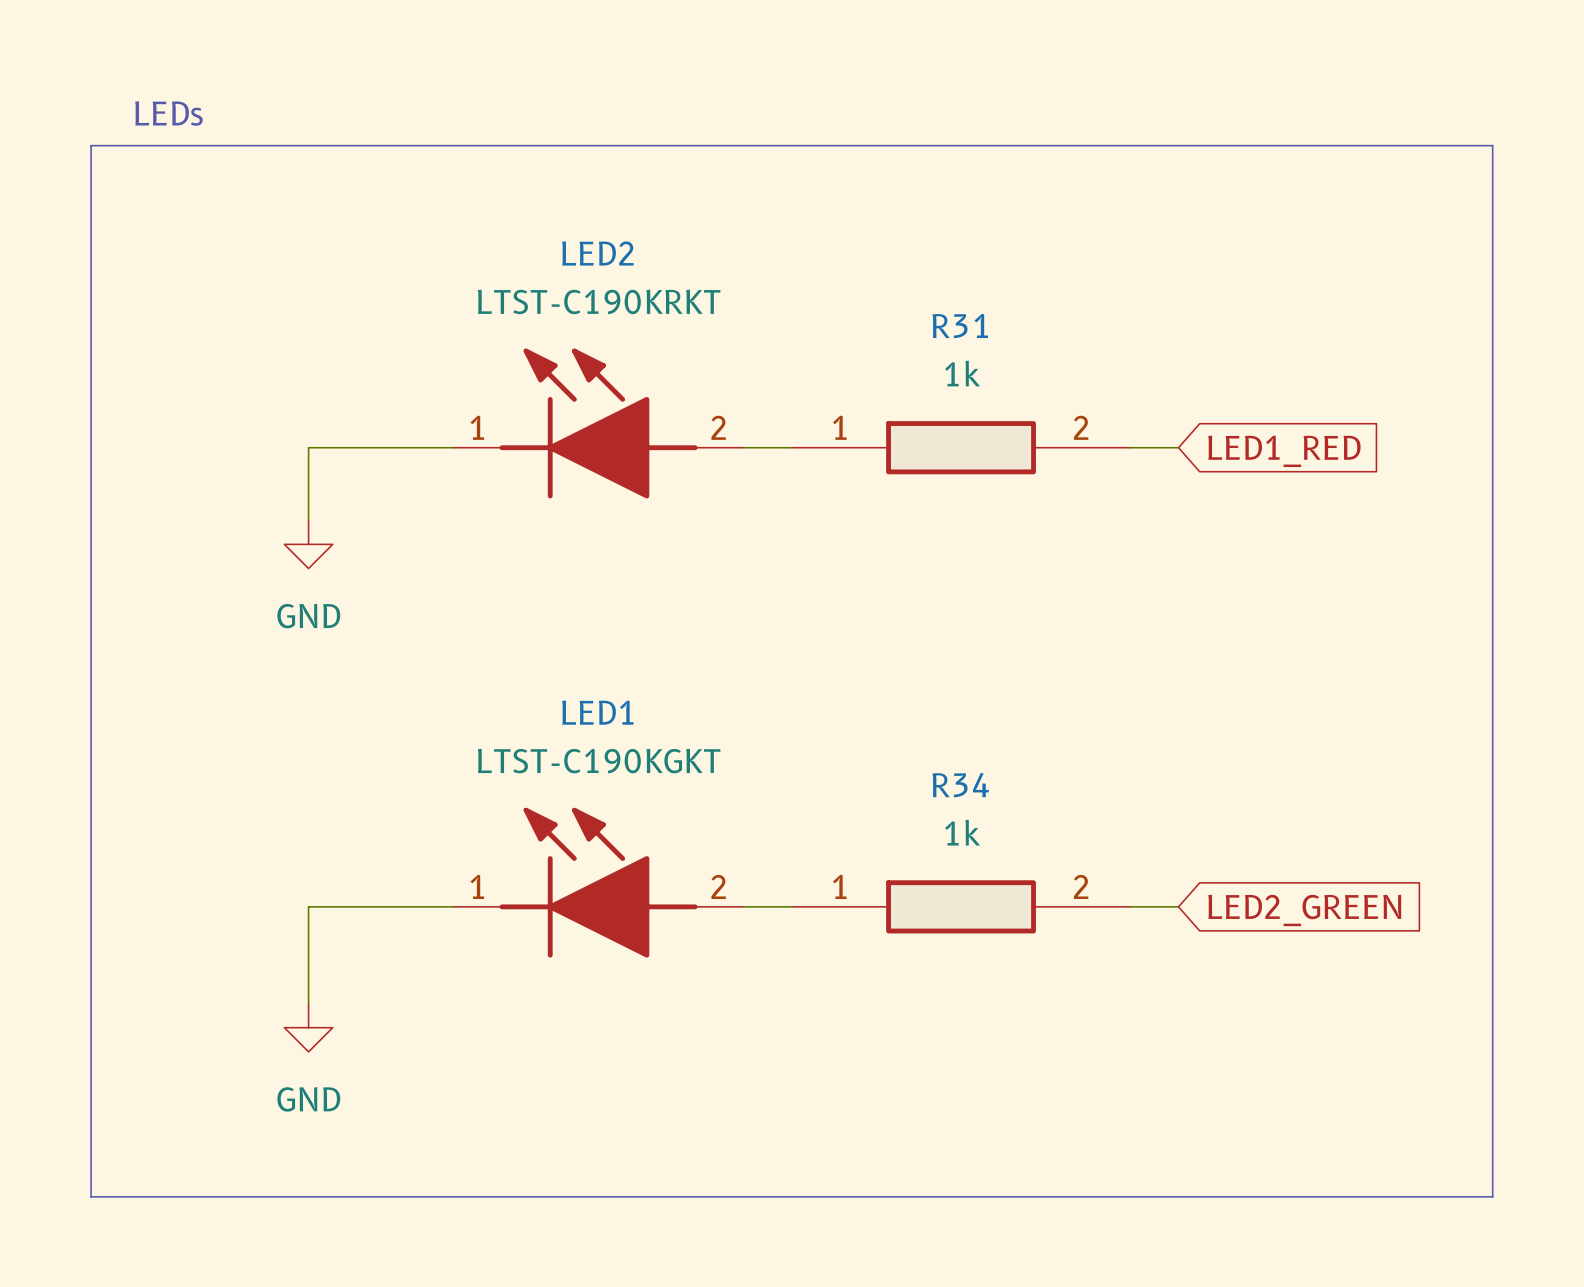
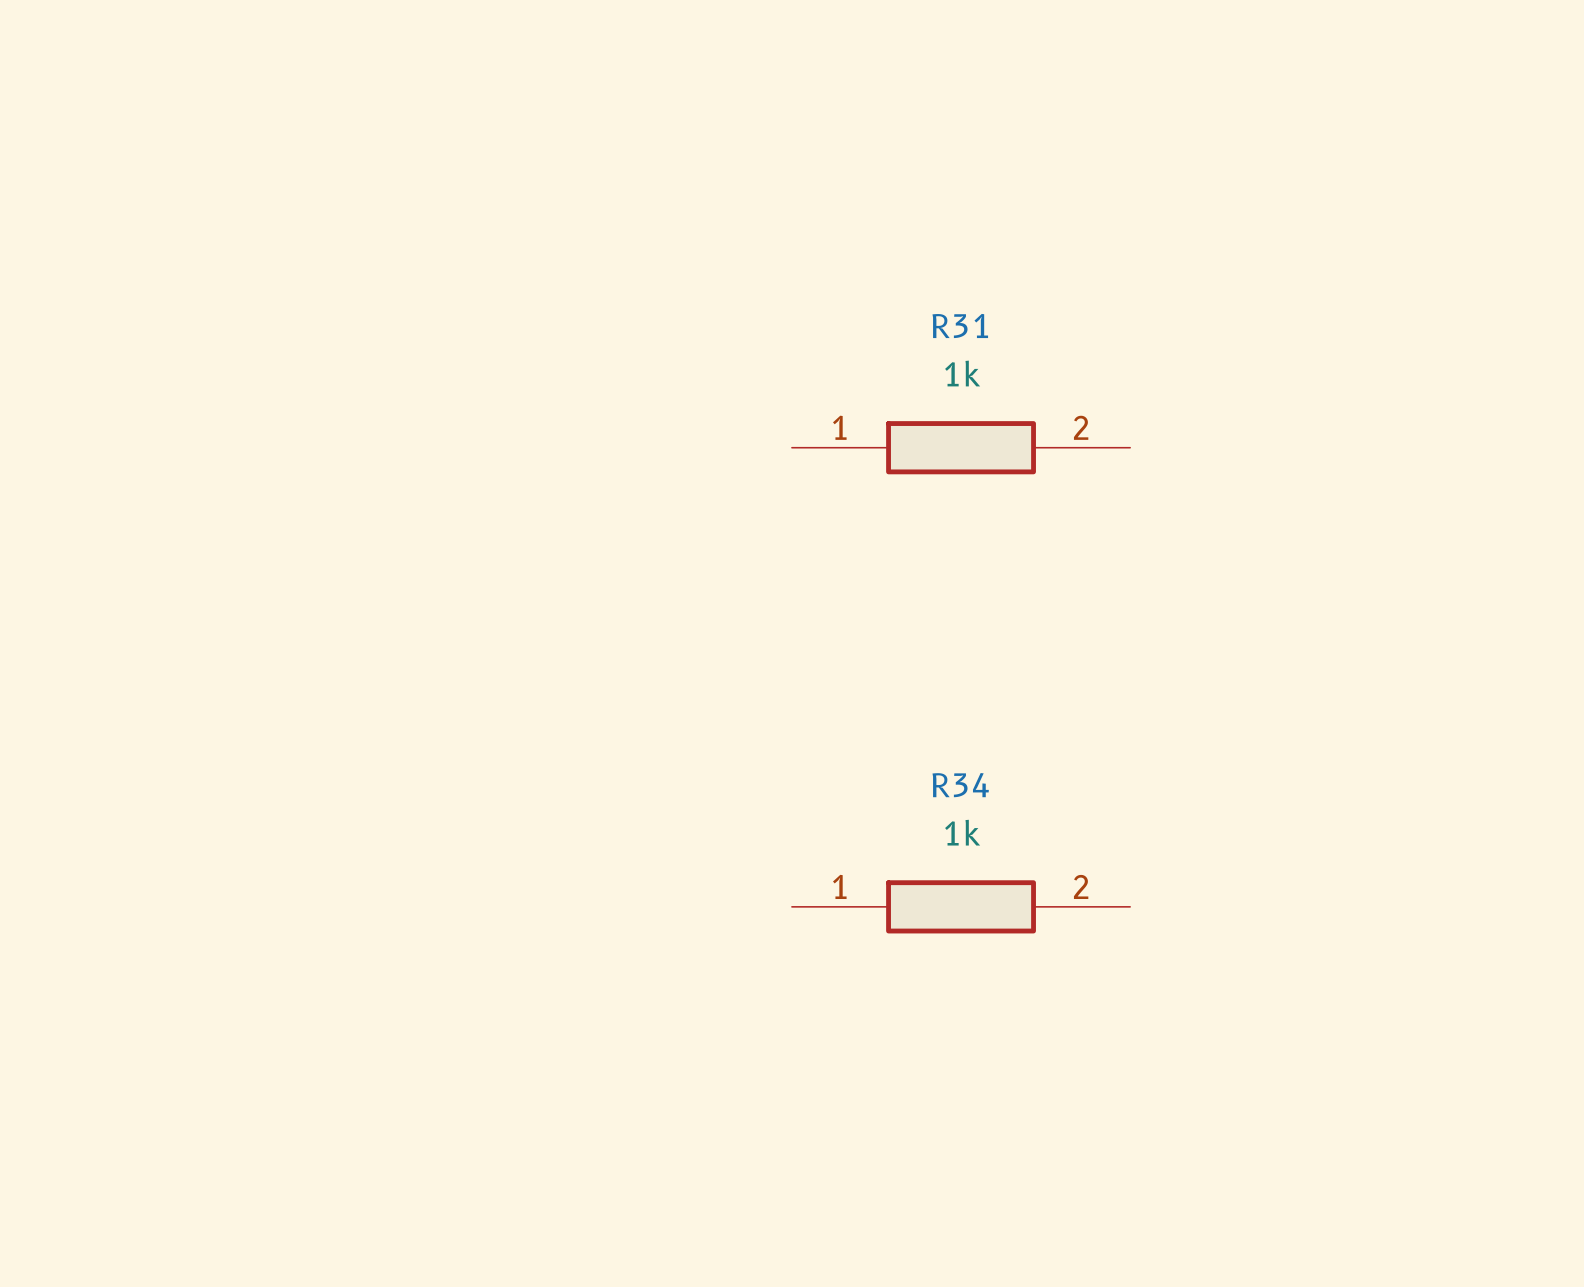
text: LEDs (168, 113) -> none
line: (91, 145) (1492, 145) (1492, 1196) (91, 1196) (91, 145) -> none
LED2: LTST-C190KRKT (598, 423) -> none
wire: (453, 447) (308, 447) (308, 520) -> none
wire: (743, 447) (791, 447) -> none
wire: (1130, 447) (1178, 447) -> none
global label: LED1_RED (1284, 451) -> none
power symbol: GND (308, 544) -> none
LED1: LTST-C190KGKT (598, 882) -> none
wire: (453, 906) (308, 906) (308, 1003) -> none
wire: (743, 906) (791, 906) -> none
wire: (1130, 906) (1178, 906) -> none
global label: LED2_GREEN (1304, 910) -> none
power symbol: GND (308, 1027) -> none

